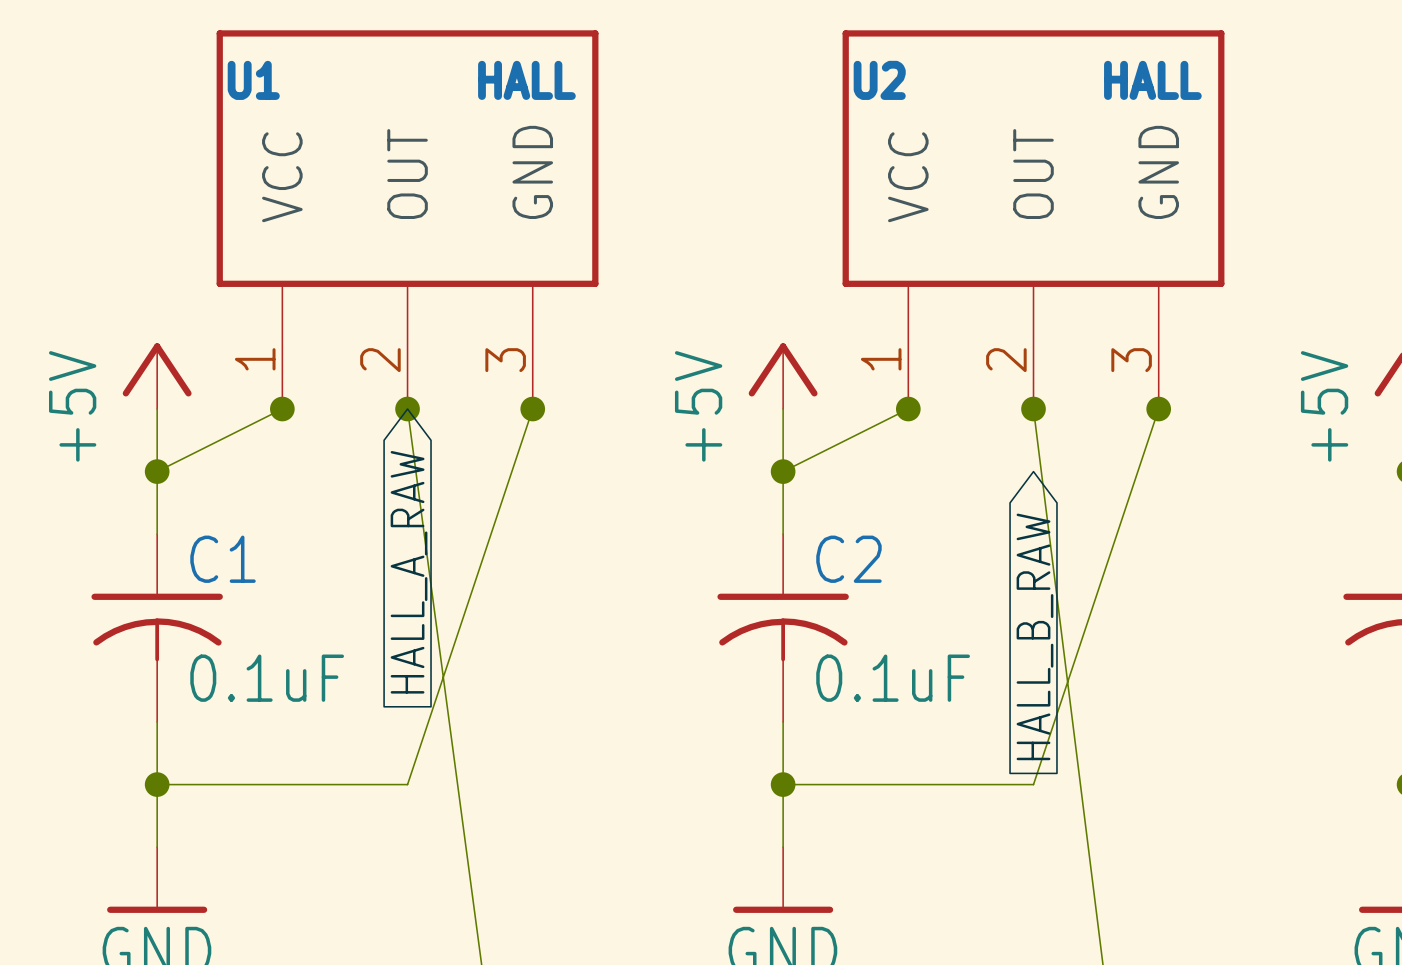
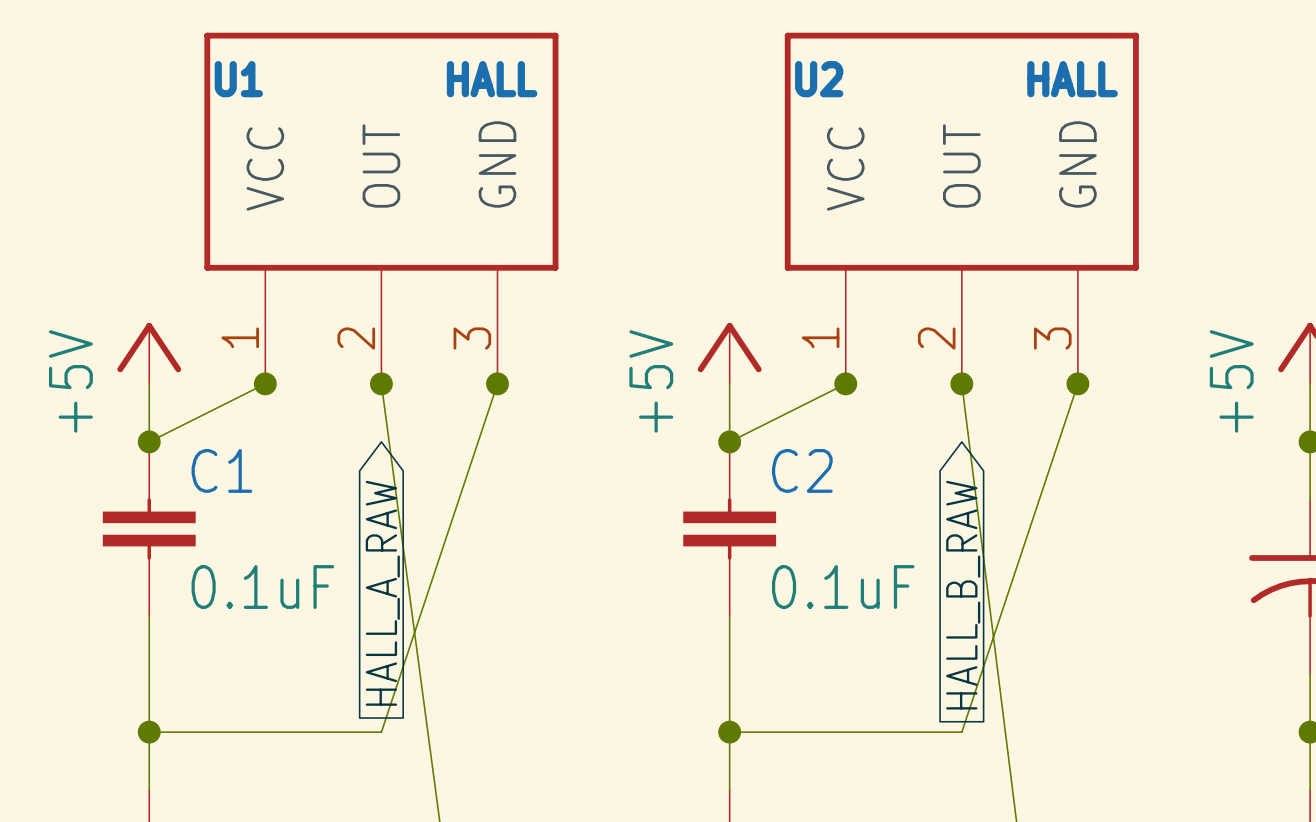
C1 symbol: [91, 534, 223, 722] -> [102, 441, 196, 617]
C2 symbol: [717, 534, 849, 722] -> [683, 441, 777, 617]
global label position: HALL_A_RAW (409, 572) -> HALL_A_RAW (382, 593)

